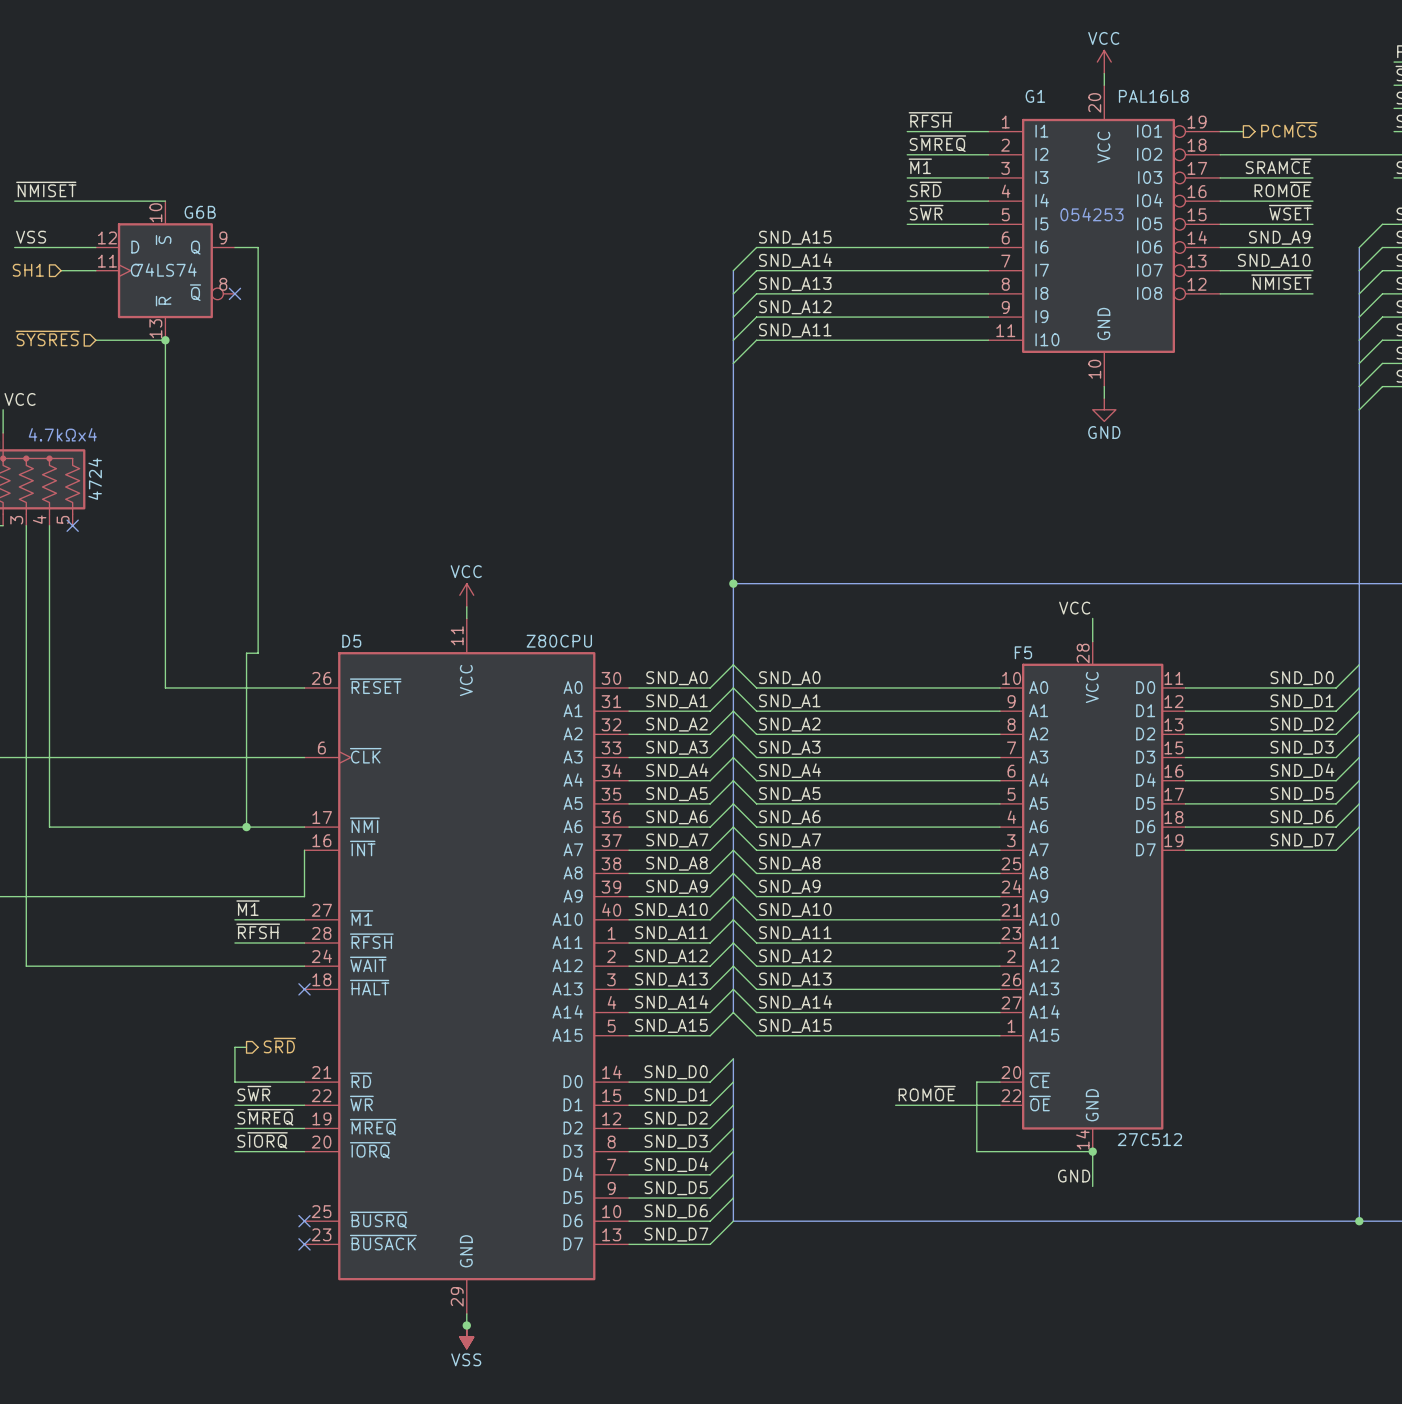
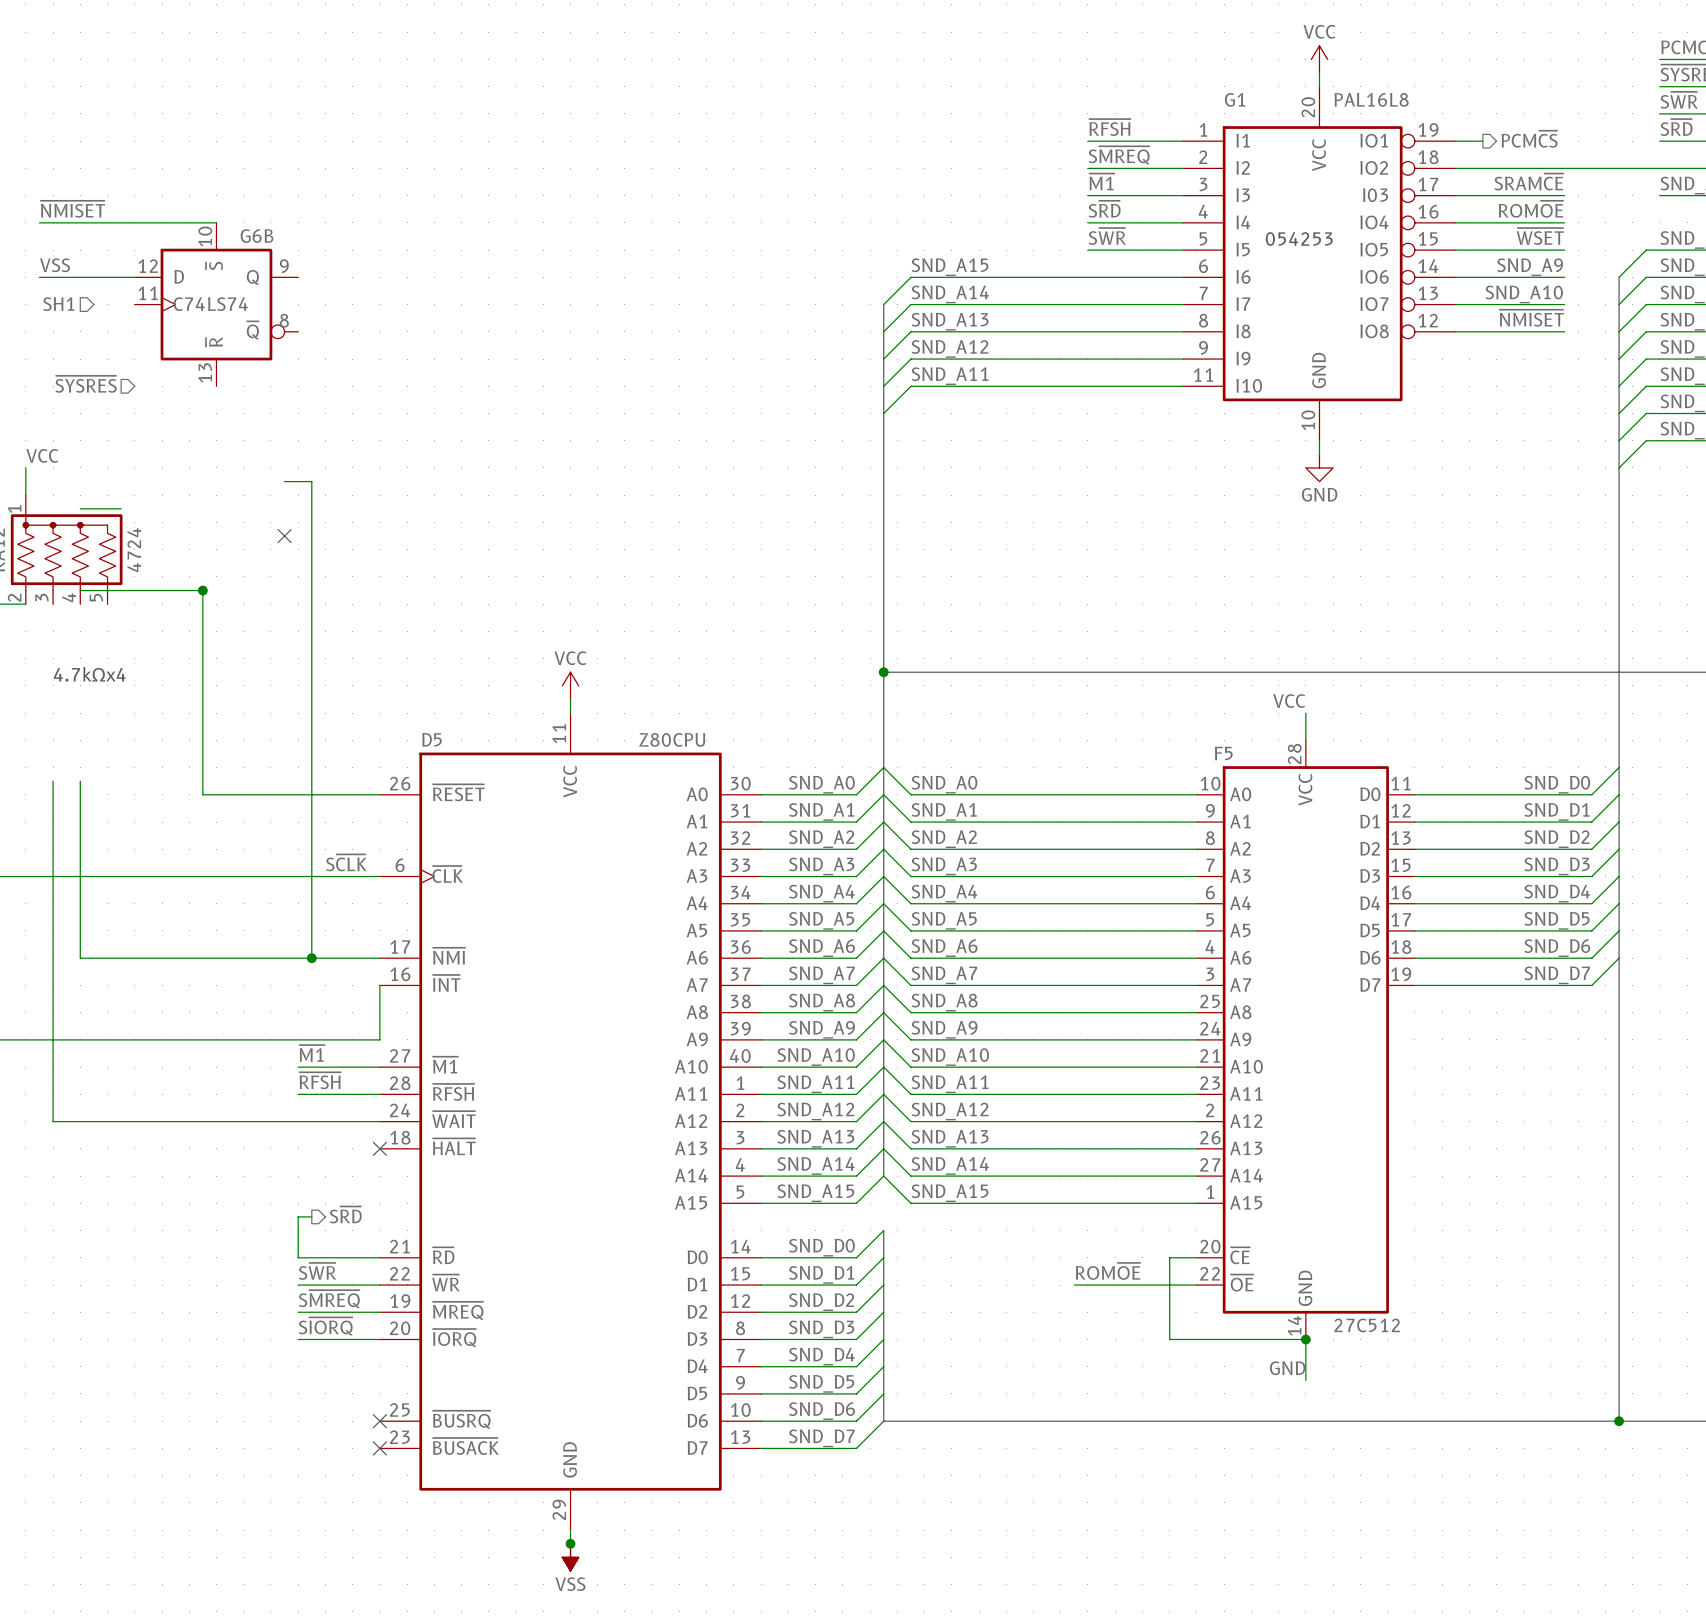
wire: (234, 247) (258, 247) (258, 653) (246, 653) -> (284, 481) (311, 481) (311, 753)
wire: (61, 270) (95, 270) -> (80, 508) (121, 508)
no-connect mark: (234, 293) -> none
wire: (95, 340) (165, 340) (165, 687) -> (80, 590) (202, 590) (202, 794) (216, 794)
junction: (165, 340) -> none
text position: 4.7kΩx4 (62, 434) -> 4.7kΩx4 (89, 674)
no-connect mark: none -> (284, 536)
junction: none -> (202, 590)
wire: (26, 525) (26, 676) -> none
wire: (49, 525) (49, 676) -> none
no-connect mark: (72, 525) -> none
label: none -> S~{CLK} (346, 862)

